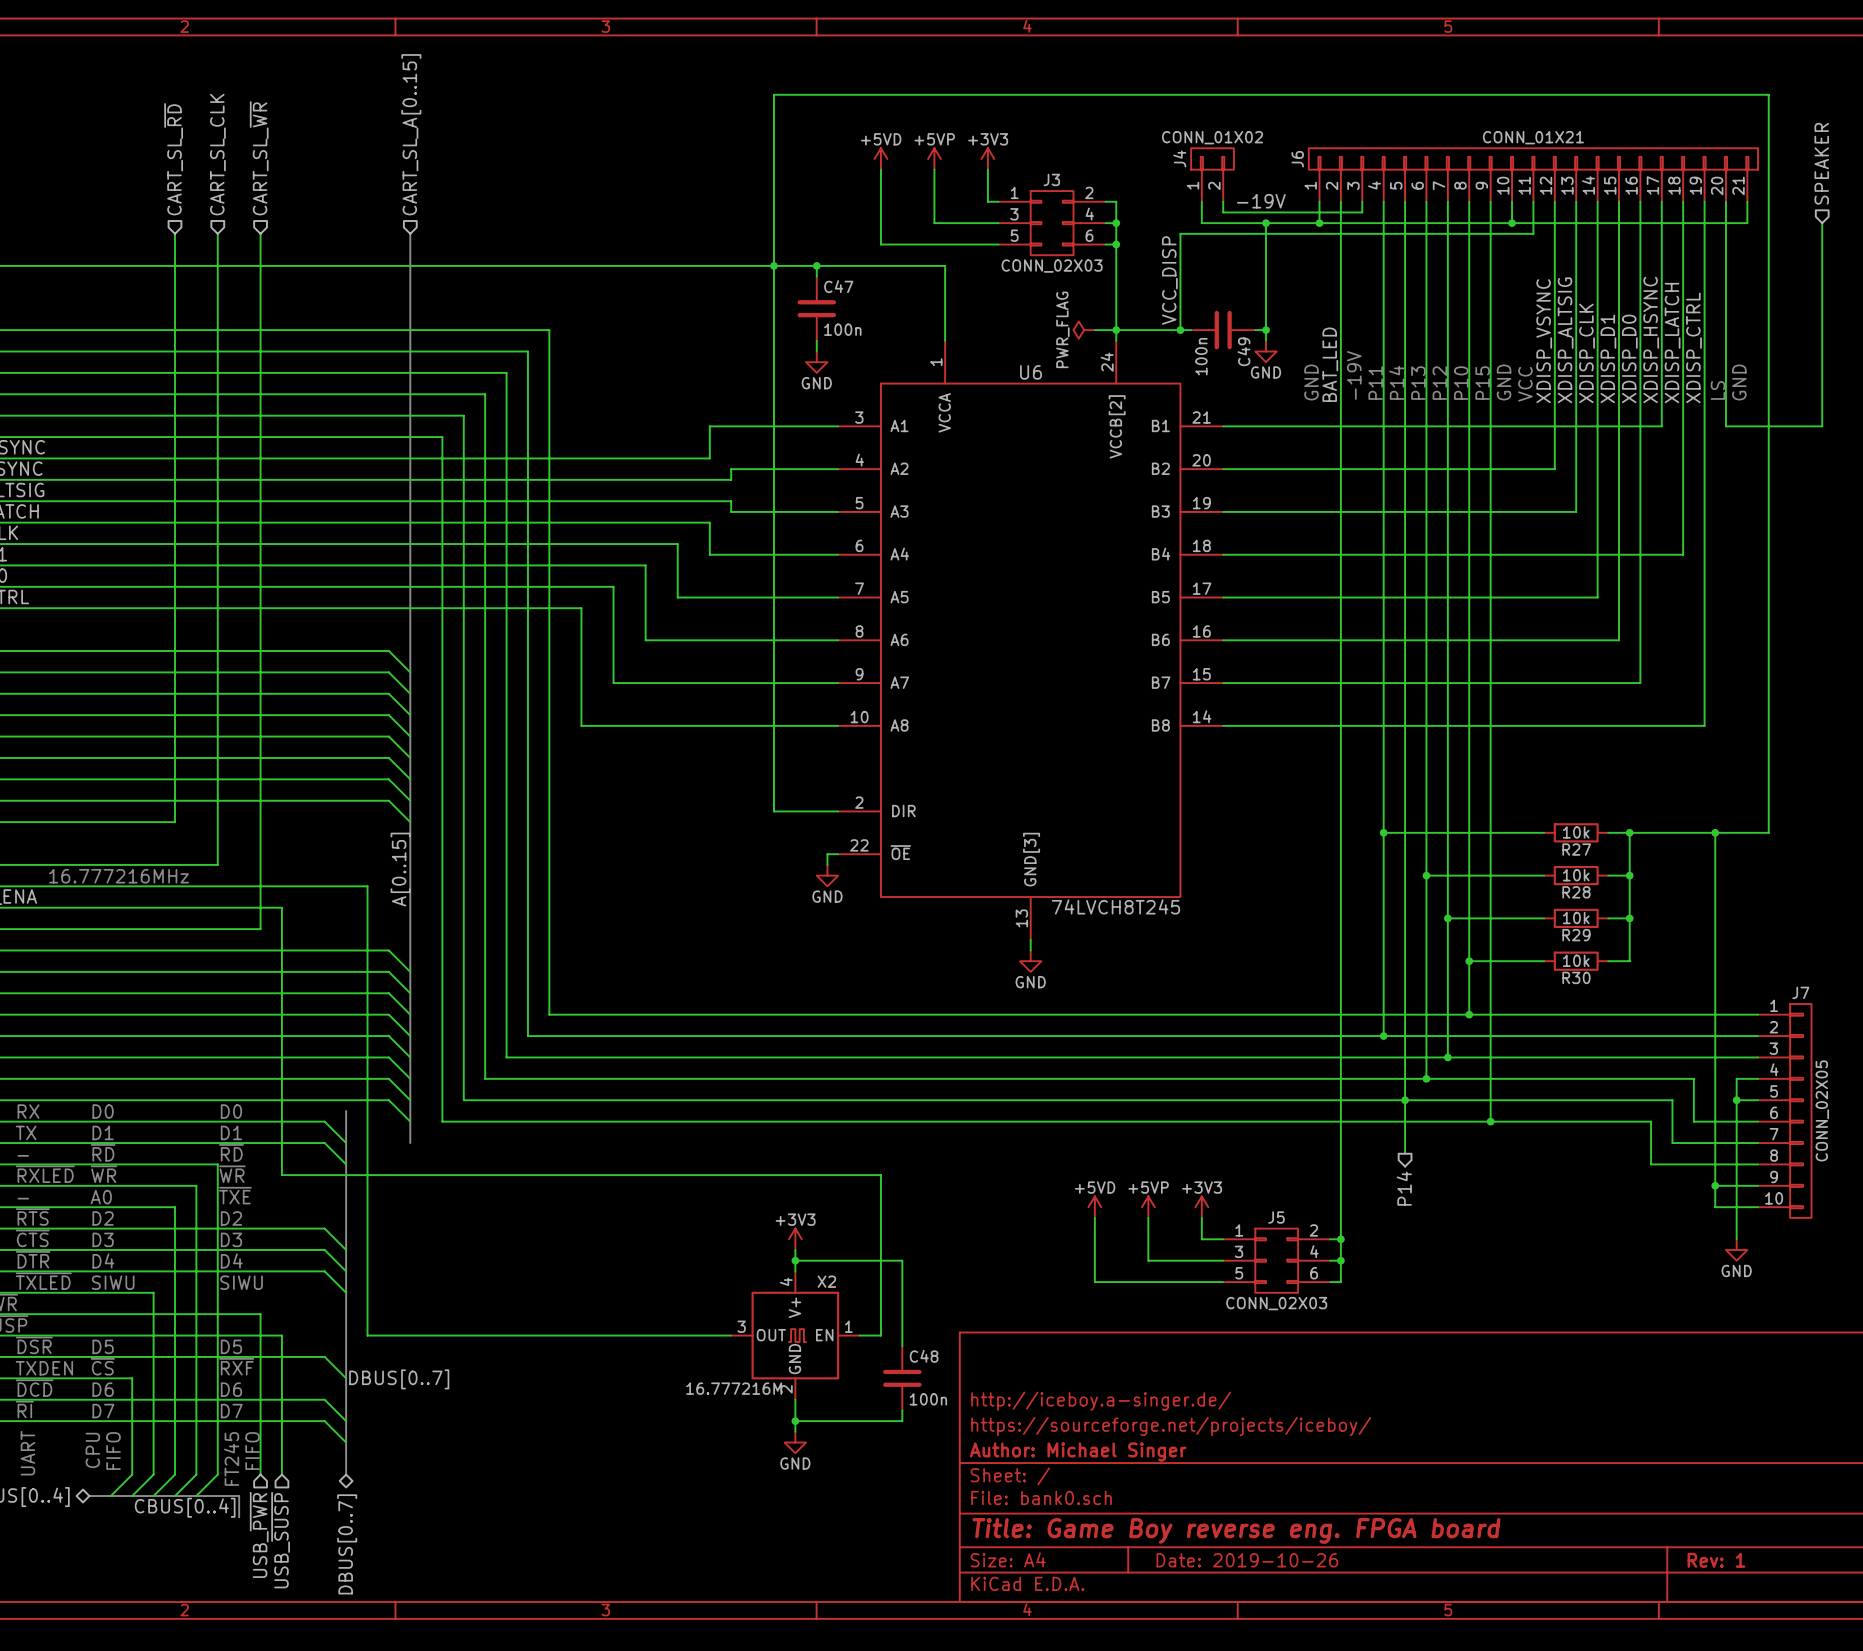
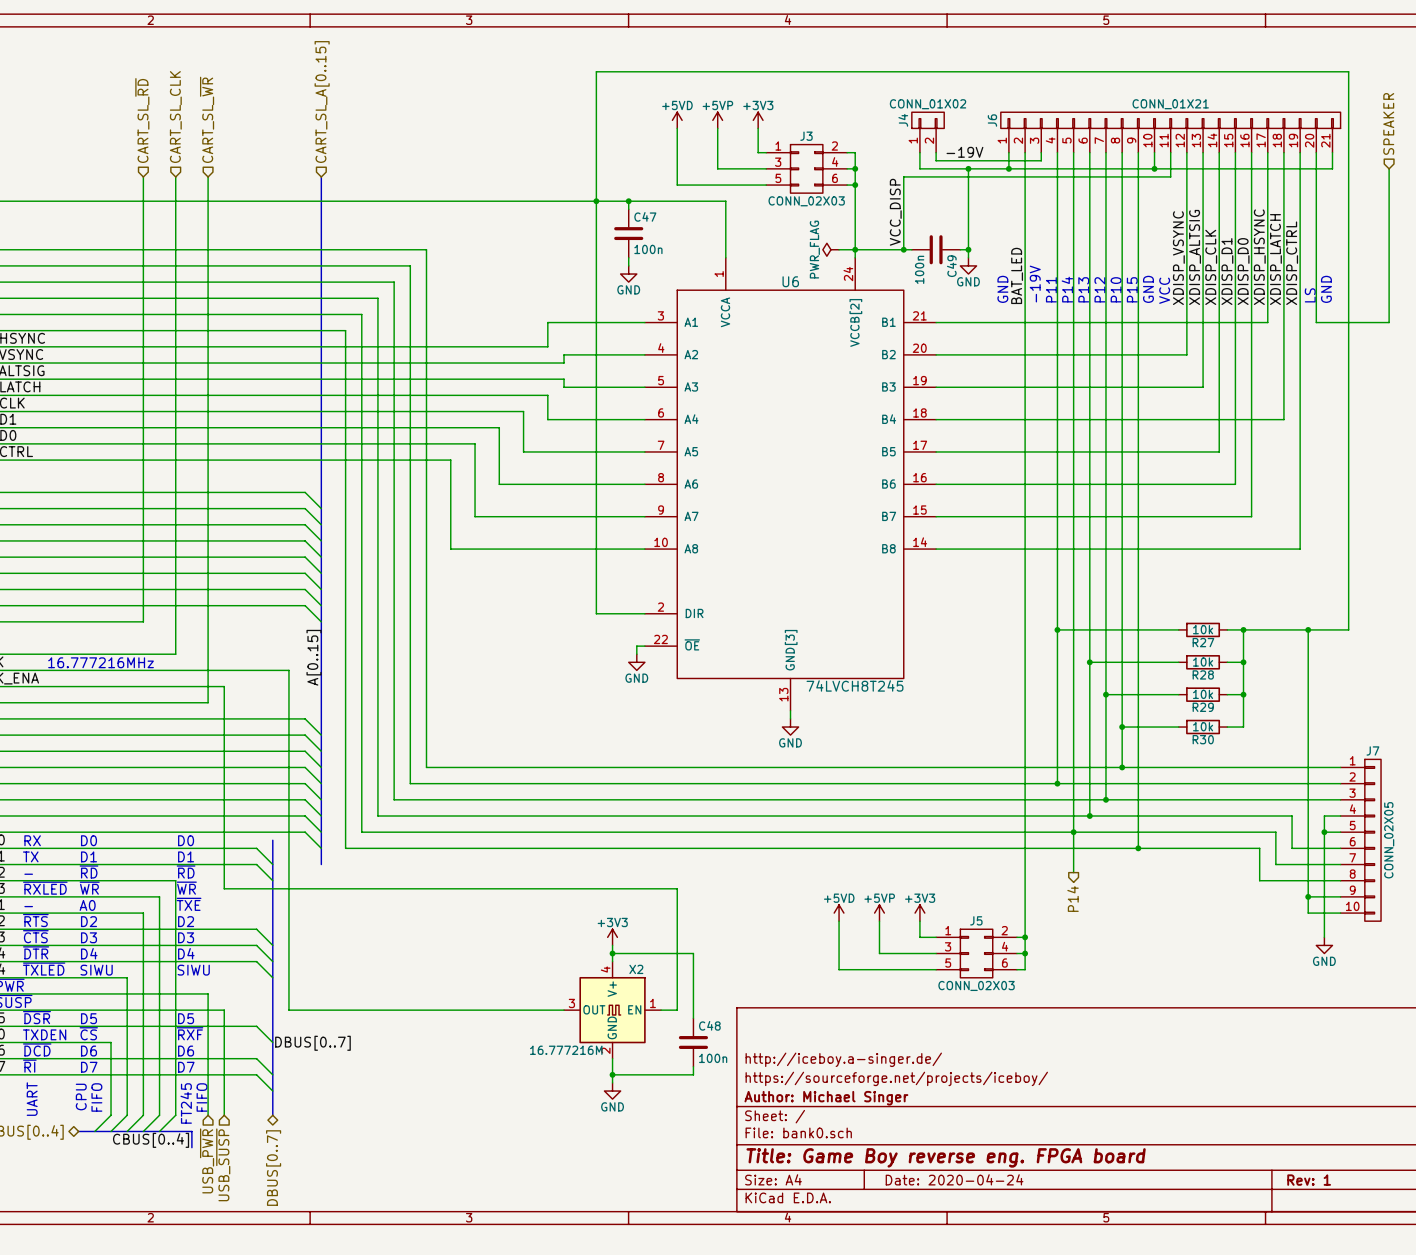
title block: Date: 2019-10-26 (1247, 1560) -> Date: 2020-04-24 (954, 1179)

